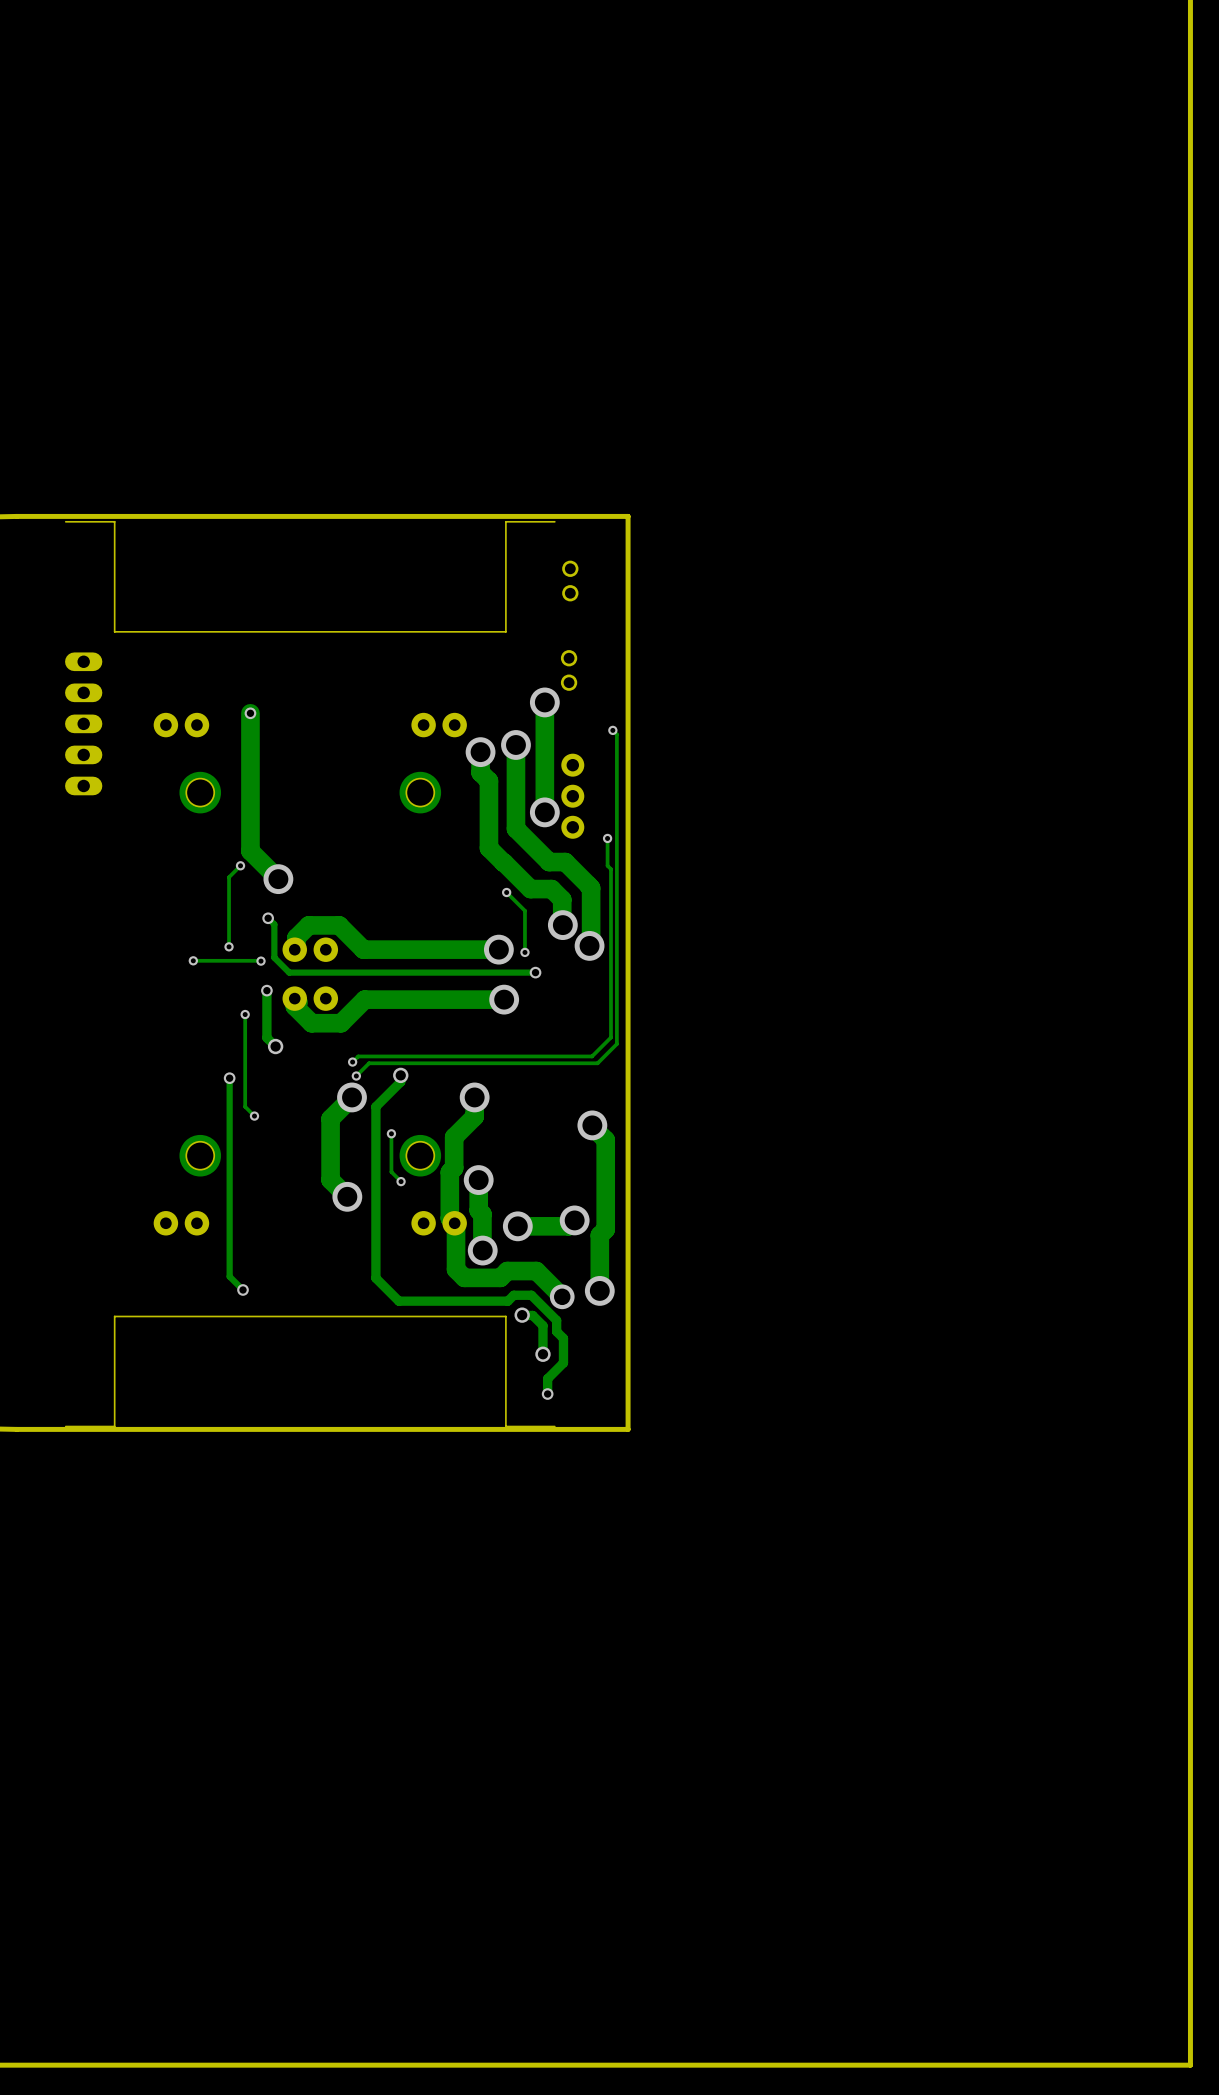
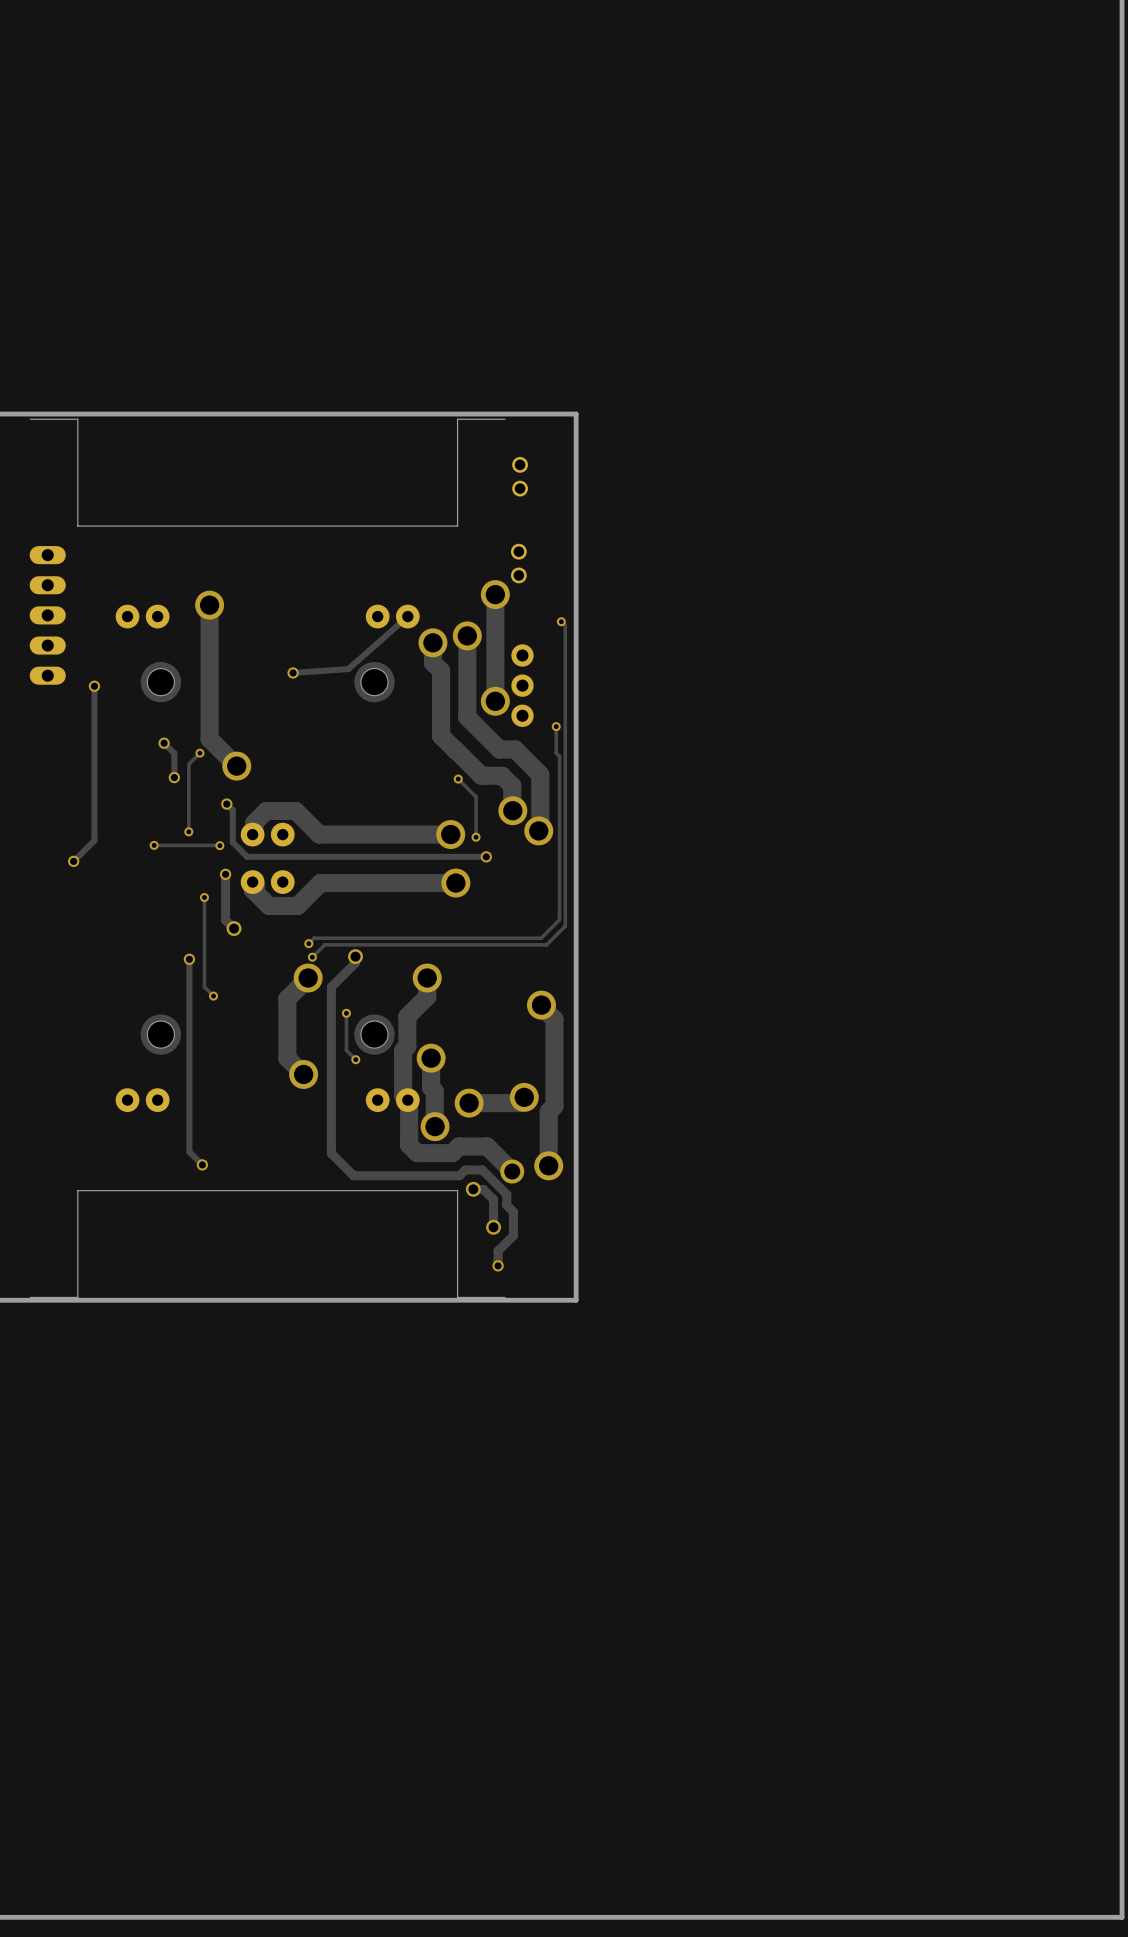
via size: [244, 707, 257, 720] -> [195, 590, 225, 620]
track: none -> (407, 616) (348, 669) (293, 672)
via: none -> (293, 672)
track: none -> (94, 686) (94, 840) (73, 861)
via: none -> (94, 686)
track: none -> (164, 743) (174, 753) (174, 777)
via: none -> (164, 743)
via: none -> (174, 777)
via: none -> (73, 861)

